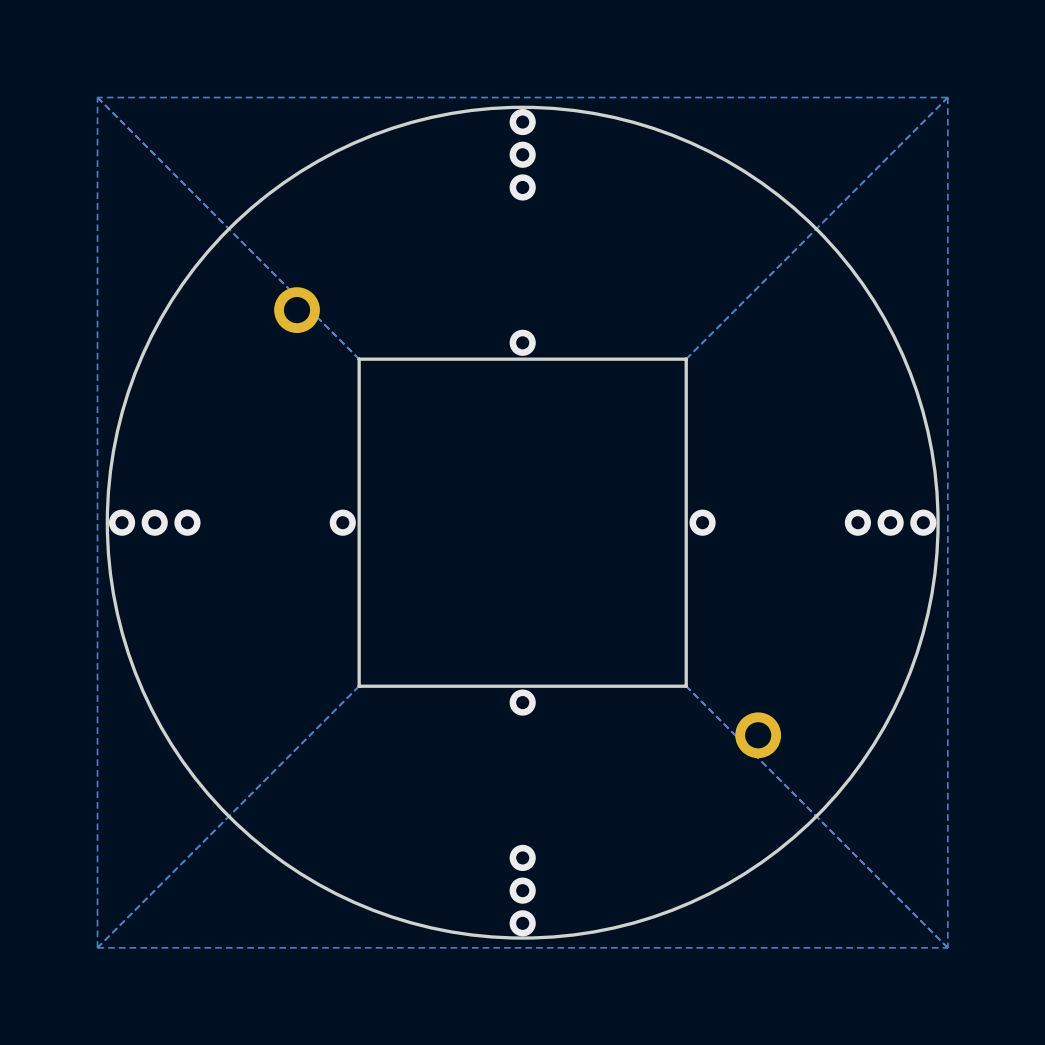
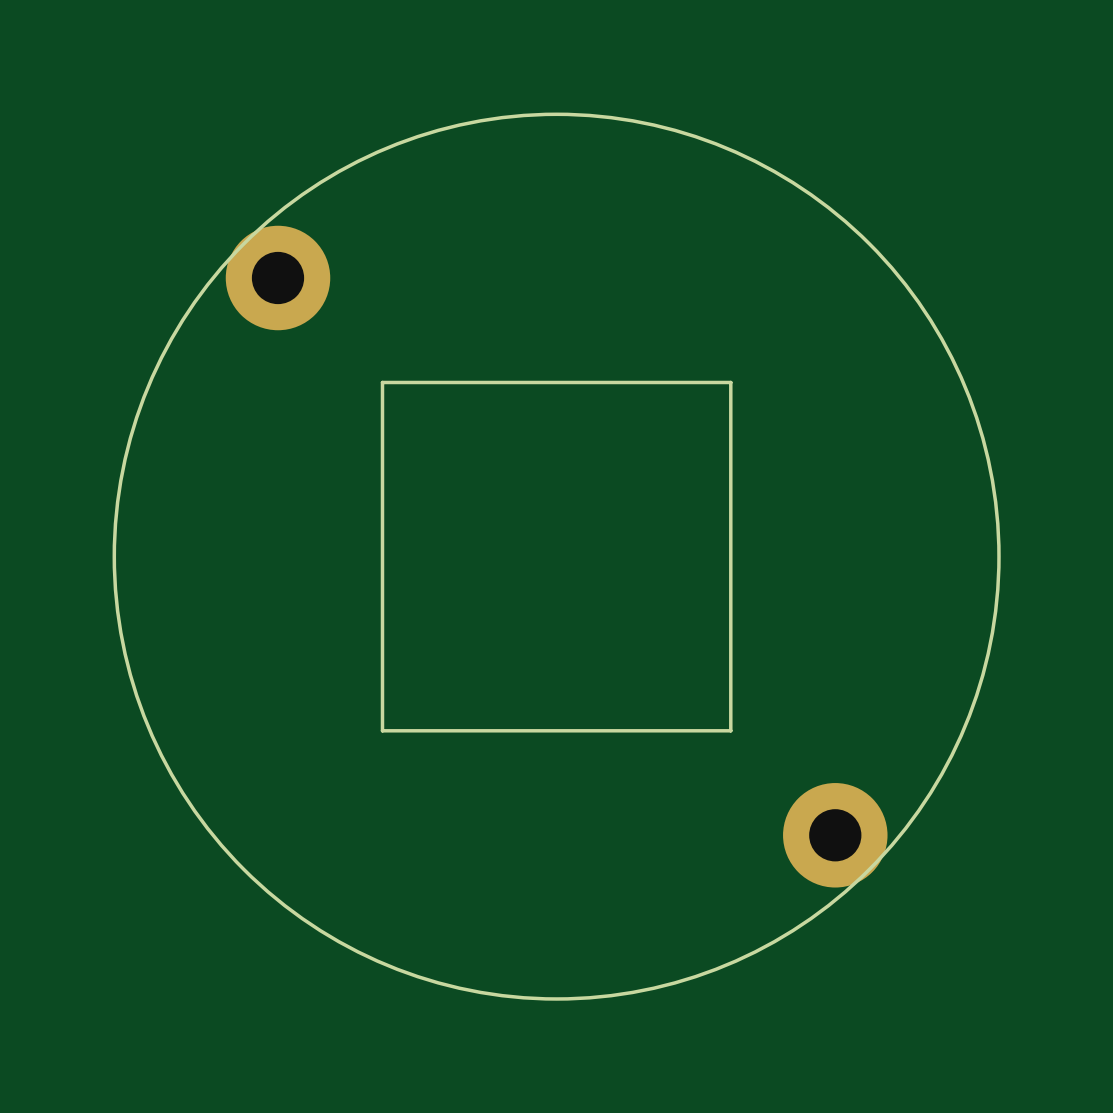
zone outline: (97, 97) (359, 359) -> none
zone outline: (97, 97) (97, 947) -> none
zone outline: (947, 97) (686, 359) -> none
zone outline: (947, 97) (947, 947) -> none
zone outline: (947, 97) (97, 97) -> none
via: (522, 122) -> none
via: (522, 154) -> none
via: (522, 187) -> none
via: none -> (278, 278)
part: (297, 310) -> none
via: (522, 342) -> none
via: (122, 522) -> none
via: (154, 522) -> none
via: (187, 522) -> none
via: (342, 522) -> none
via: (702, 522) -> none
via: (857, 522) -> none
via: (890, 522) -> none
via: (923, 522) -> none
zone outline: (359, 686) (97, 947) -> none
zone outline: (686, 686) (947, 947) -> none
via: (522, 702) -> none
part: (758, 735) -> none
via: none -> (835, 835)
via: (522, 857) -> none
via: (522, 890) -> none
via: (522, 923) -> none
zone outline: (947, 947) (97, 947) -> none

